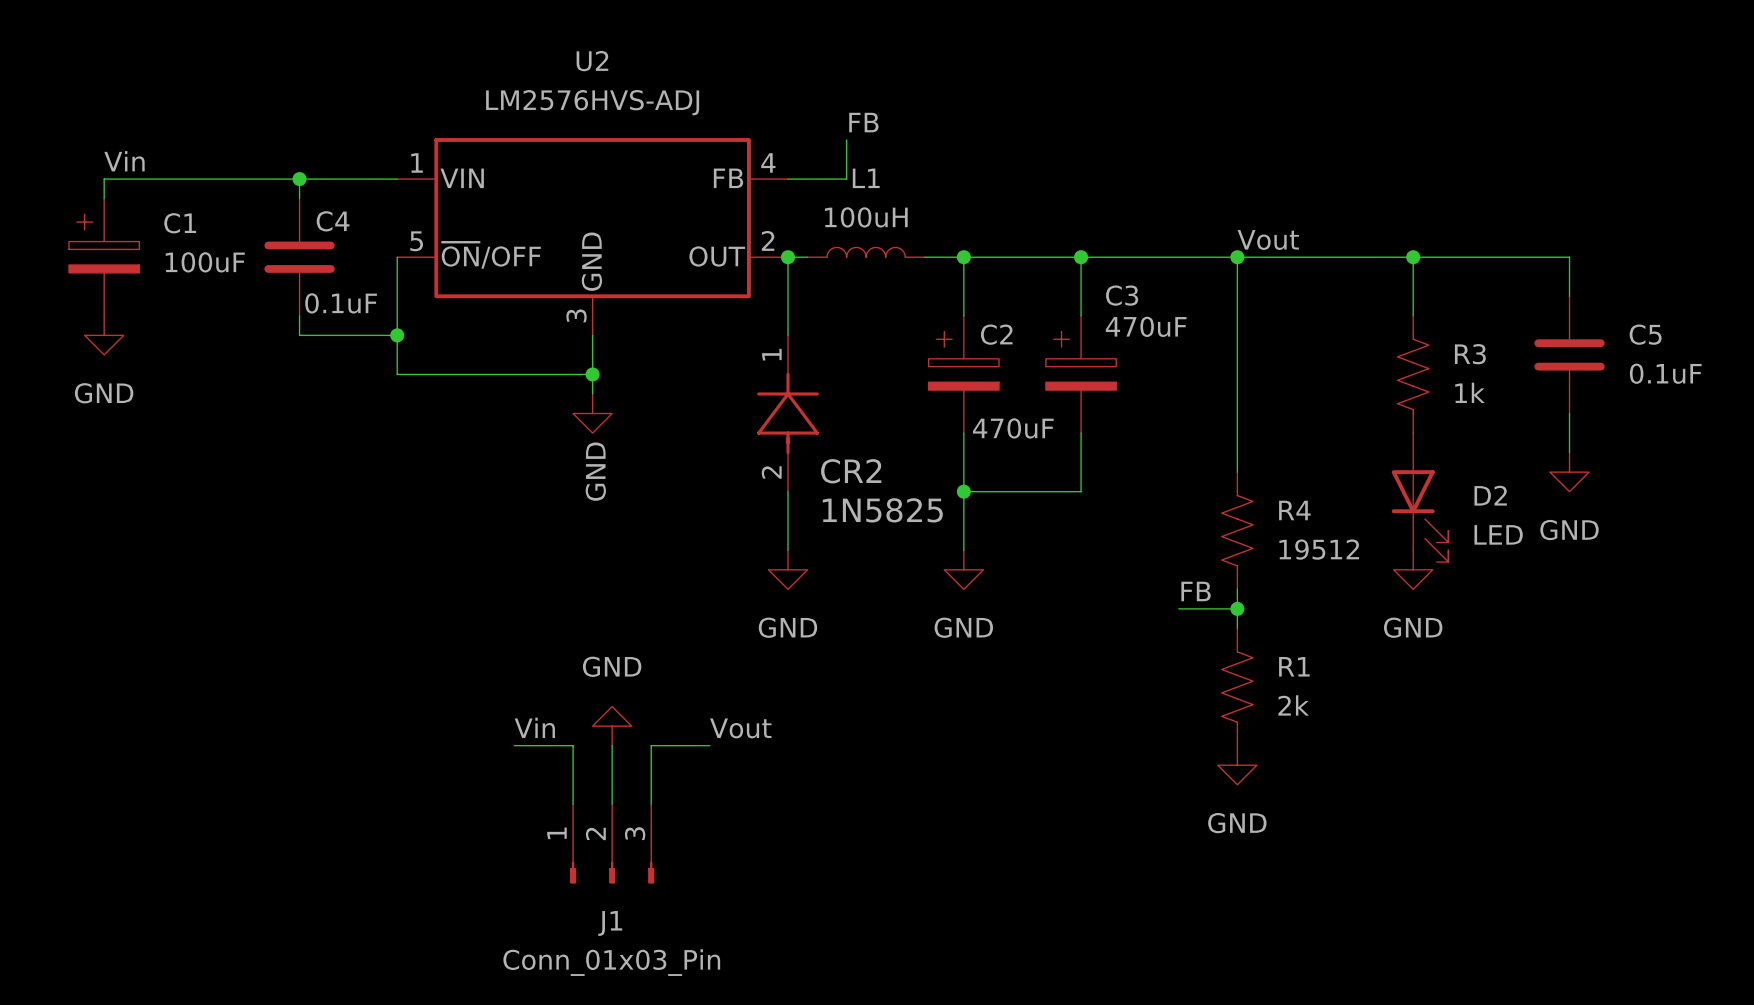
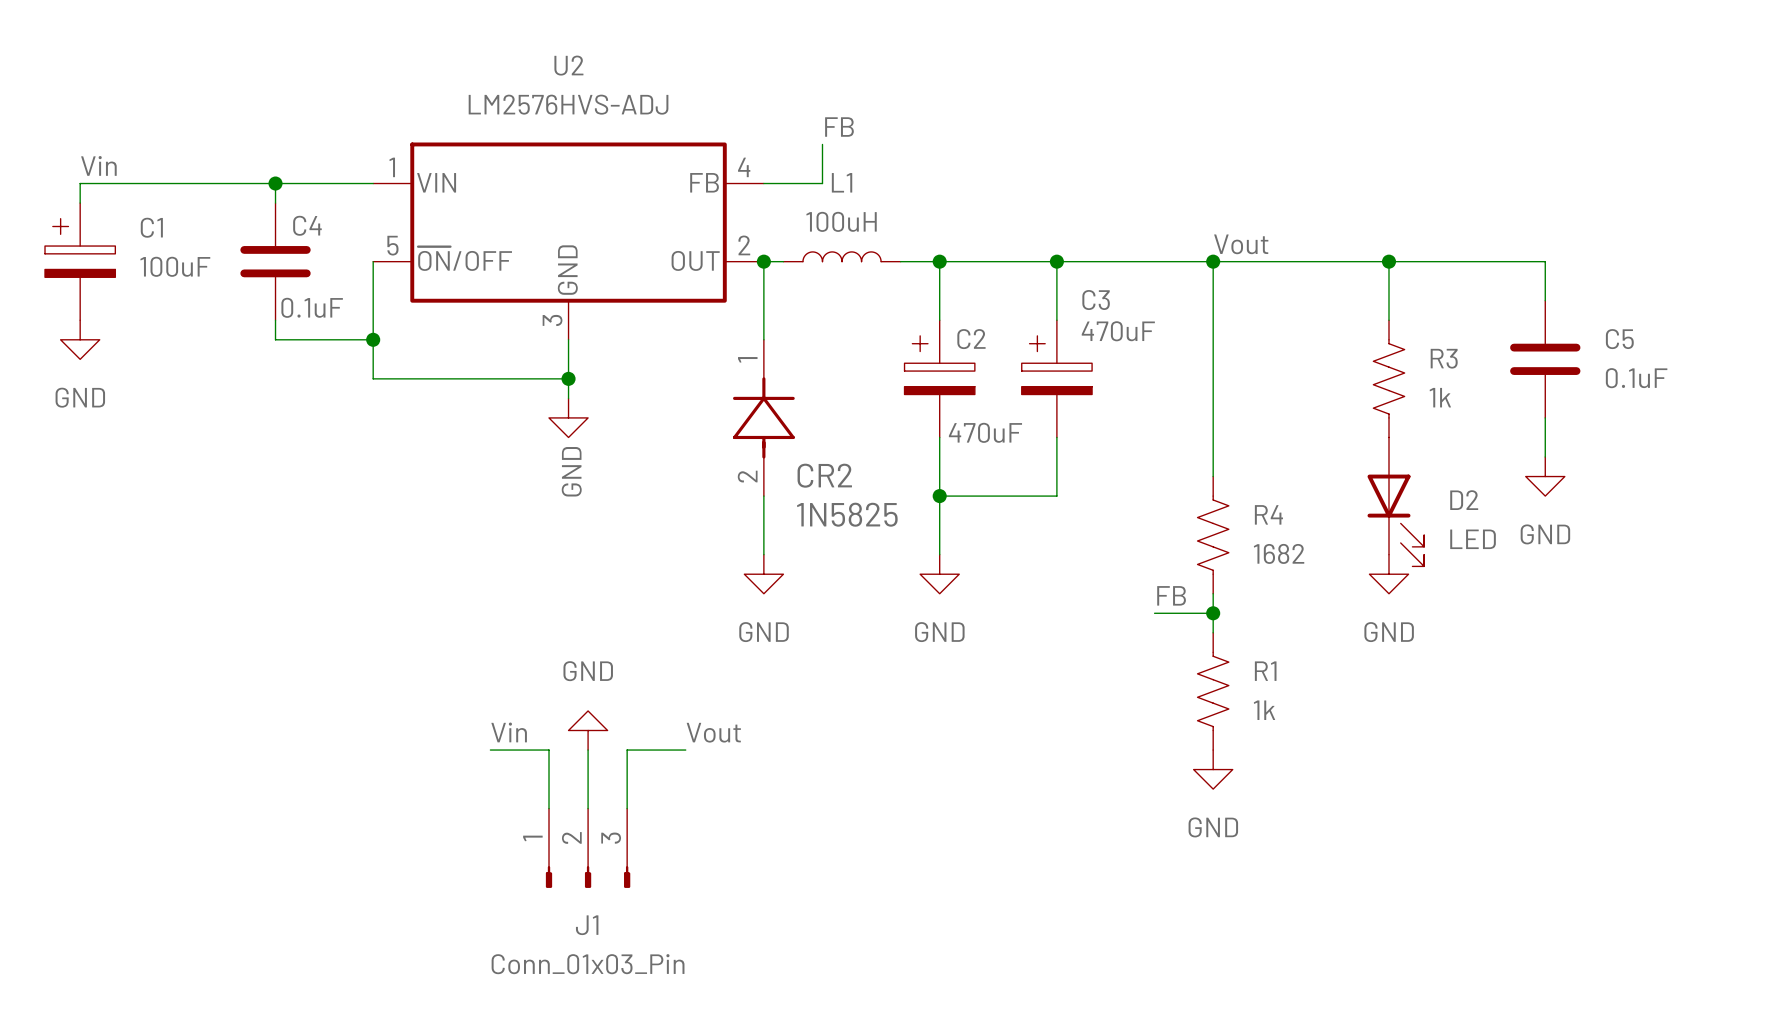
R4 value: 19512 (1319, 549) -> 1682 (1279, 553)
R1 value: 2k (1293, 705) -> 1k (1264, 710)

